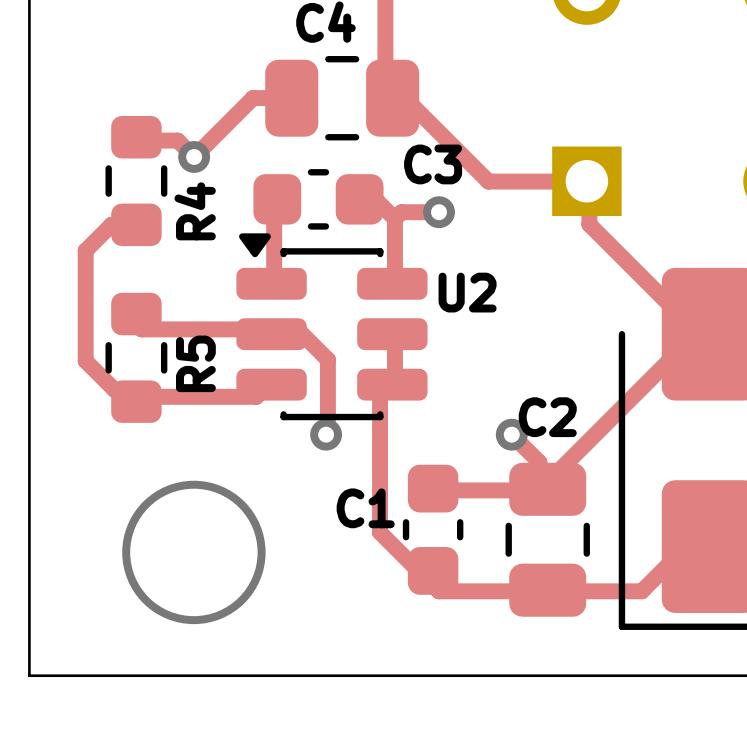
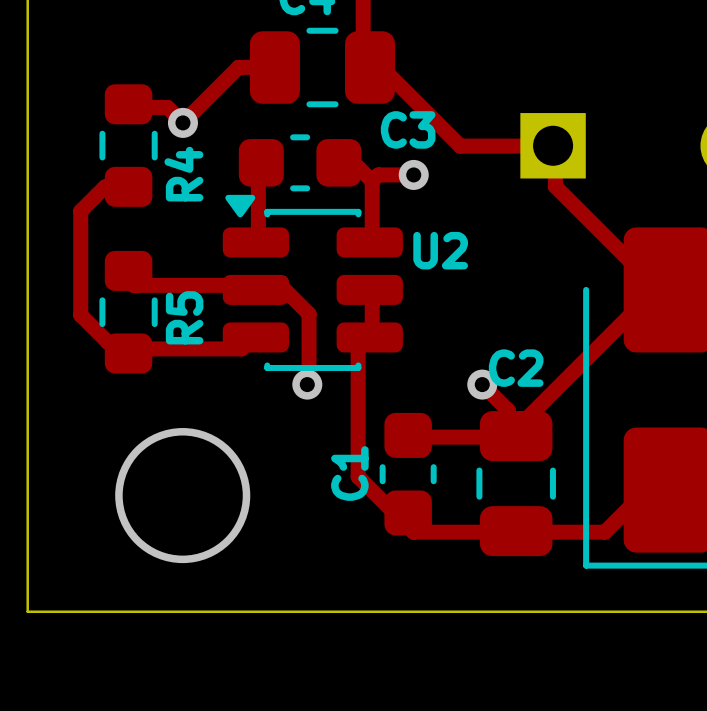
C1 name rotation: 0° (365, 508) -> 90° counterclockwise (349, 473)

